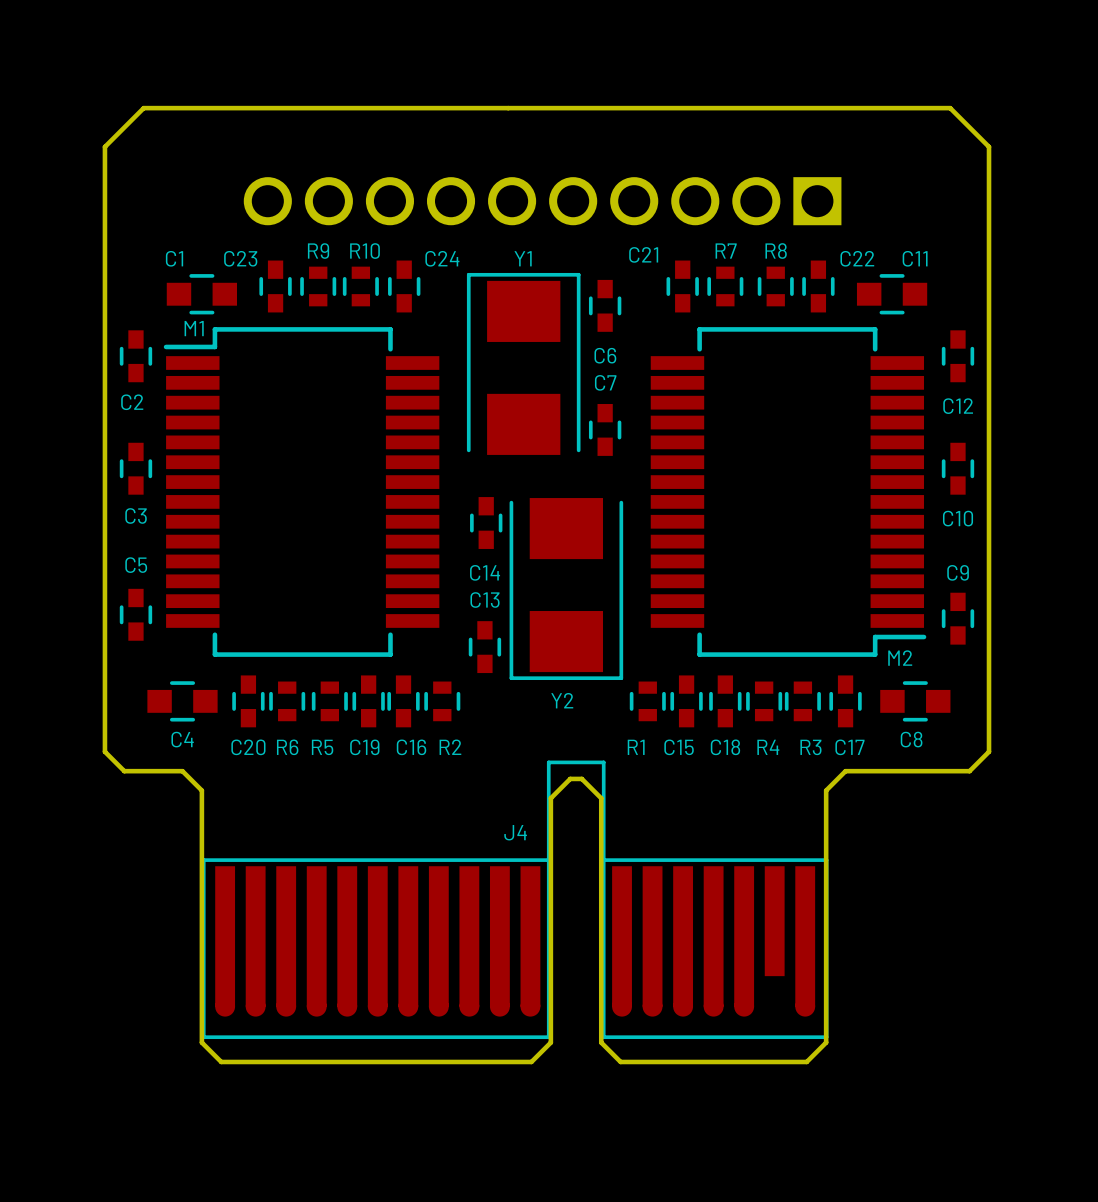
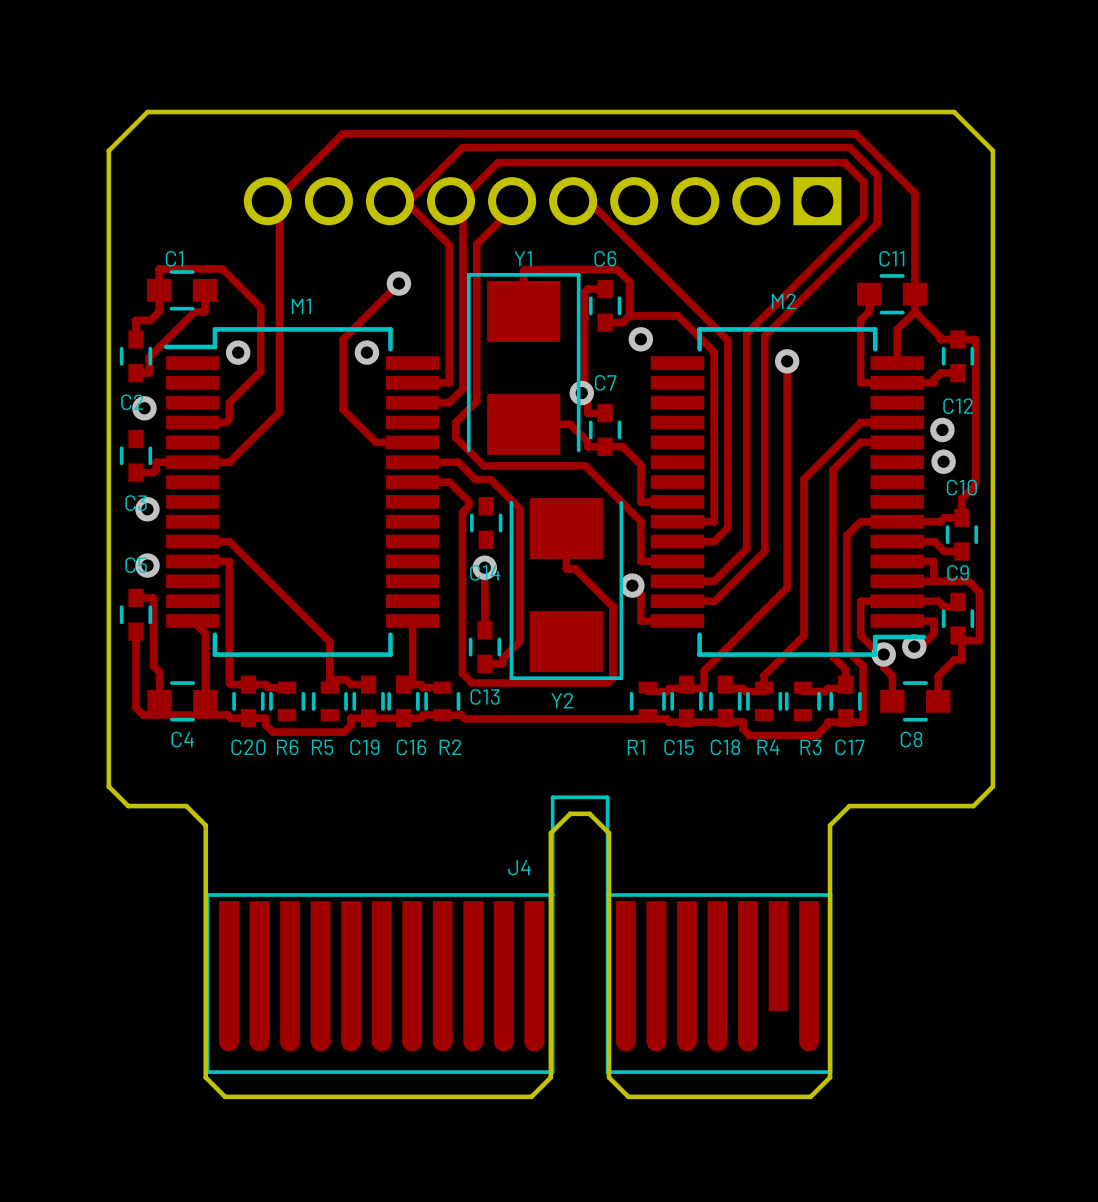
board edge: (954, 112) (950, 108) (143, 108) (104, 146) (104, 751) (124, 771) (182, 771) (201, 790) (201, 1042) (221, 1061) (531, 1061) (550, 1042) -> (954, 112) (147, 112) (108, 150) (108, 786) (128, 806) (186, 806) (205, 825) (205, 1077) (225, 1096) (531, 1096) (550, 1077) (550, 1042)
board edge: (989, 146) (989, 751) (969, 771) (845, 771) (826, 790) (826, 1042) (806, 1061) (620, 1061) (601, 1042) (601, 798) (581, 778) (570, 778) (550, 798) (550, 833) -> (989, 146) (992, 150) (992, 786) (973, 806) (849, 806) (830, 825) (830, 1077) (810, 1096) (628, 1096) (609, 1077) (609, 833) (589, 813) (570, 813) (550, 833)
track: none -> (401, 197) (449, 244) (449, 382) (412, 382)
track: none -> (523, 197) (476, 244) (476, 401) (455, 422) (455, 437) (483, 465) (585, 465) (640, 521) (640, 561) (677, 561)
track: none -> (584, 197) (727, 340) (727, 527) (714, 541) (677, 541)
track: none -> (407, 202) (462, 147) (849, 147) (877, 175) (877, 223) (764, 336) (764, 551) (714, 601) (677, 601)
C11 name position: C11 (915, 258) -> C11 (891, 258)
track: none -> (398, 283) (343, 339) (343, 409) (375, 442) (412, 442)
via: none -> (398, 283)
C23: (275, 286) -> none
R9: (318, 286) -> none
R10: (360, 286) -> none
C24: (404, 286) -> none
C21: (682, 286) -> none
R7: (725, 286) -> none
R8: (775, 286) -> none
C22: (818, 286) -> none
track: none -> (605, 289) (587, 289) (584, 291) (584, 393)
track: none -> (205, 290) (205, 311) (194, 311) (149, 357) (149, 373) (135, 373)
track: none -> (869, 290) (869, 311) (860, 320) (860, 382) (933, 382) (933, 379) (940, 373) (957, 373)
C1 position: (201, 294) -> (182, 290)
track: none -> (523, 311) (525, 269) (617, 269) (629, 281) (629, 315)
track: none -> (914, 311) (897, 329) (897, 363)
track: none -> (914, 311) (914, 193) (855, 133) (342, 133) (279, 197) (279, 412) (229, 462) (156, 462) (156, 470) (153, 472) (135, 472)
track: none -> (914, 311) (940, 337) (940, 339) (975, 339) (975, 485) (961, 498) (961, 517) (944, 517) (940, 521) (860, 521) (846, 535) (846, 650) (863, 666) (863, 722) (827, 722) (816, 735) (749, 735) (742, 728) (742, 722) (669, 722) (666, 718) (465, 718) (461, 715) (423, 715) (421, 718) (351, 718) (351, 725) (344, 732) (272, 732) (265, 725) (265, 718) (230, 718) (227, 715) (143, 715) (135, 707) (135, 631)
track: none -> (629, 315) (678, 315) (714, 352) (714, 521) (677, 521)
track: none -> (629, 315) (622, 322) (605, 322)
M1 name position: M1 (194, 328) -> M1 (301, 306)
track: none -> (135, 339) (135, 320) (150, 320) (159, 311) (159, 268) (222, 268) (260, 307) (260, 371) (229, 402) (229, 419) (226, 422) (192, 422)
via: none -> (640, 339)
via: none -> (238, 352)
via: none -> (366, 352)
C6 name position: C6 (605, 355) -> C6 (605, 258)
track: none -> (787, 361) (787, 587) (704, 670) (704, 688) (669, 688) (666, 691) (647, 691)
via: none -> (787, 361)
via: none -> (581, 393)
track: none -> (584, 393) (587, 395) (587, 413) (605, 413)
track: none -> (412, 402) (449, 402) (463, 388) (463, 197) (498, 162) (844, 162) (863, 181) (863, 216) (746, 333) (746, 548) (714, 581) (677, 581)
via: none -> (144, 408)
track: none -> (897, 422) (860, 422) (803, 479) (803, 635) (764, 675) (764, 691) (725, 688)
track: none -> (523, 424) (570, 424) (587, 441) (587, 446) (622, 446) (640, 464) (640, 501) (677, 501)
via: none -> (942, 429)
track: none -> (897, 442) (860, 442) (832, 470) (832, 656) (845, 669) (845, 688) (827, 688) (824, 691) (802, 691)
via: none -> (943, 461)
track: none -> (412, 462) (458, 462) (475, 479) (490, 479) (519, 508) (519, 641) (502, 658) (502, 663) (484, 663)
C3 position: (135, 468) -> (135, 455)
C10 position: (957, 468) -> (961, 534)
track: none -> (412, 482) (449, 482) (468, 501) (468, 506) (462, 512) (462, 673) (471, 682) (607, 682) (612, 677) (612, 606) (575, 569) (566, 569) (566, 528)
via: none -> (147, 509)
C10 name position: C10 (958, 518) -> C10 (961, 487)
track: none -> (192, 541) (229, 541) (329, 642) (329, 687)
track: none -> (897, 541) (934, 541) (944, 551) (961, 551)
track: none -> (192, 561) (229, 561) (229, 683) (287, 687)
track: none -> (897, 561) (933, 561) (933, 581)
via: none -> (147, 565)
track: none -> (484, 567) (484, 630)
via: none -> (484, 567)
track: none -> (897, 581) (968, 581) (979, 592) (979, 640) (961, 640) (961, 659) (954, 659) (938, 676) (938, 697)
track: none -> (632, 585) (640, 594) (640, 620) (677, 620)
via: none -> (632, 585)
track: none -> (135, 598) (153, 598) (153, 666) (159, 672) (159, 693)
C13 name position: C13 (485, 600) -> C13 (485, 696)
track: none -> (961, 607) (944, 607) (938, 601) (860, 601) (860, 635) (879, 654) (883, 654) (883, 667) (892, 676) (892, 697)
track: none -> (192, 620) (205, 633) (205, 715)
track: none -> (412, 620) (412, 684)
track: none -> (897, 620) (933, 620) (933, 633) (920, 646) (914, 646)
via: none -> (914, 646)
via: none -> (883, 654)
M2 name position: M2 (900, 658) -> M2 (783, 301)
track: none -> (329, 679) (346, 679) (351, 684) (368, 684)
track: none -> (403, 684) (442, 687)
J4 position: (515, 899) -> (519, 934)

